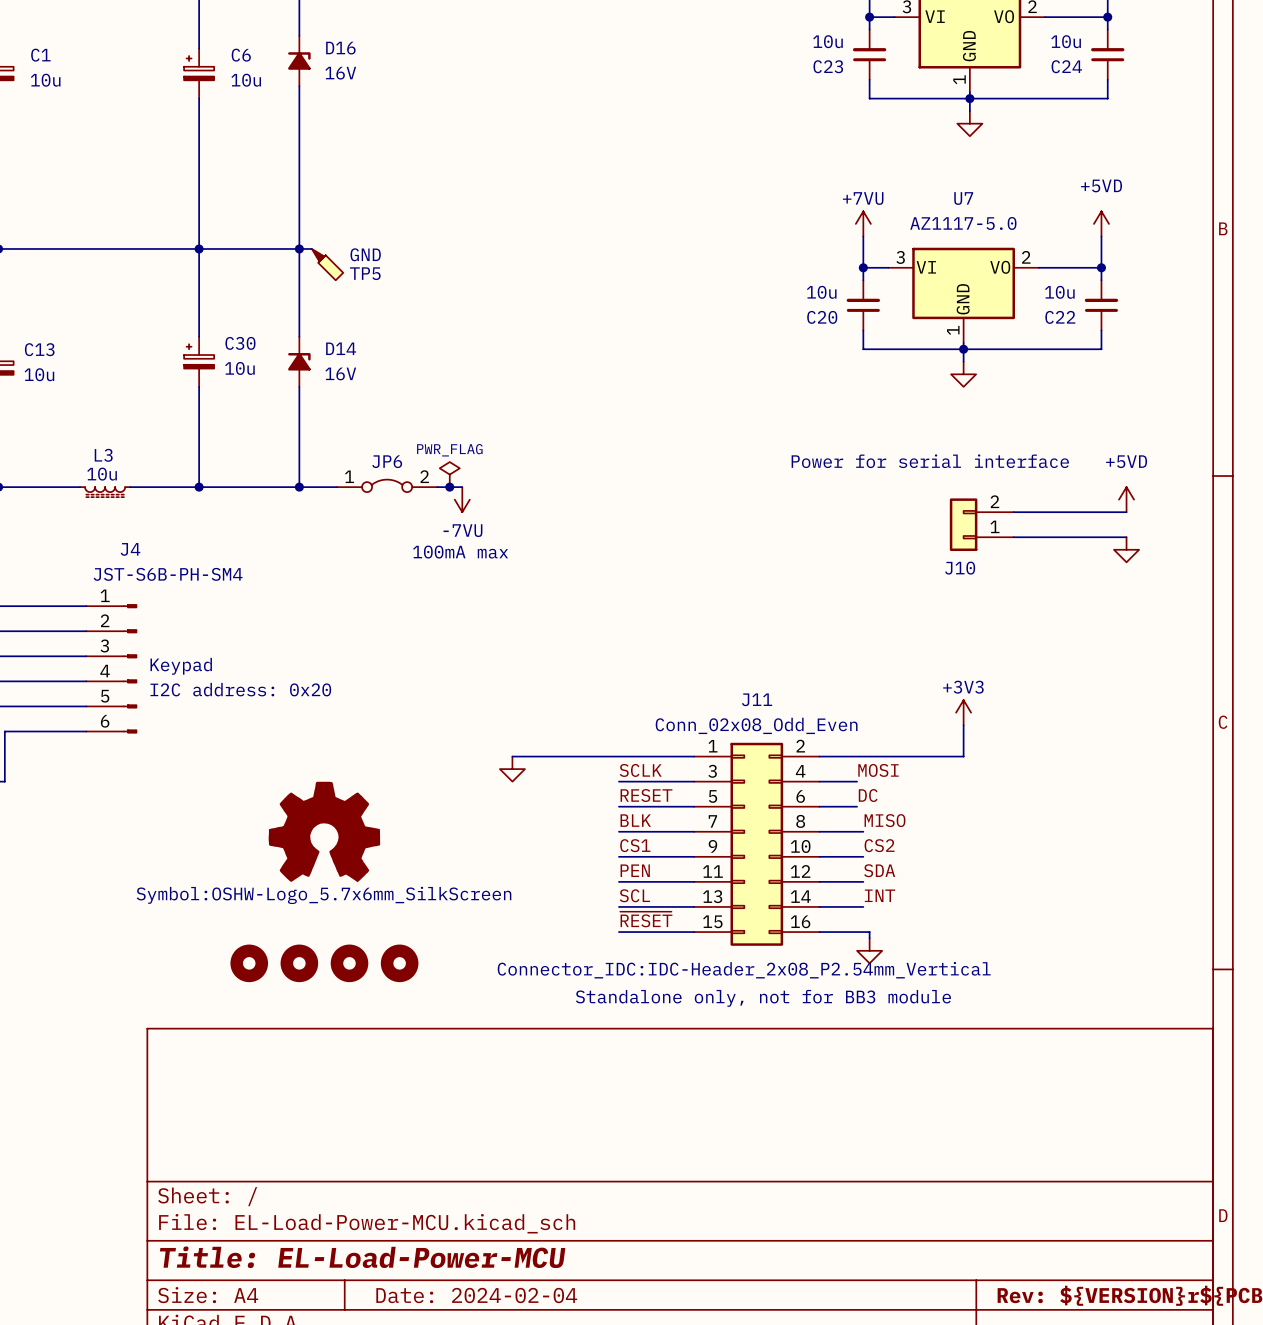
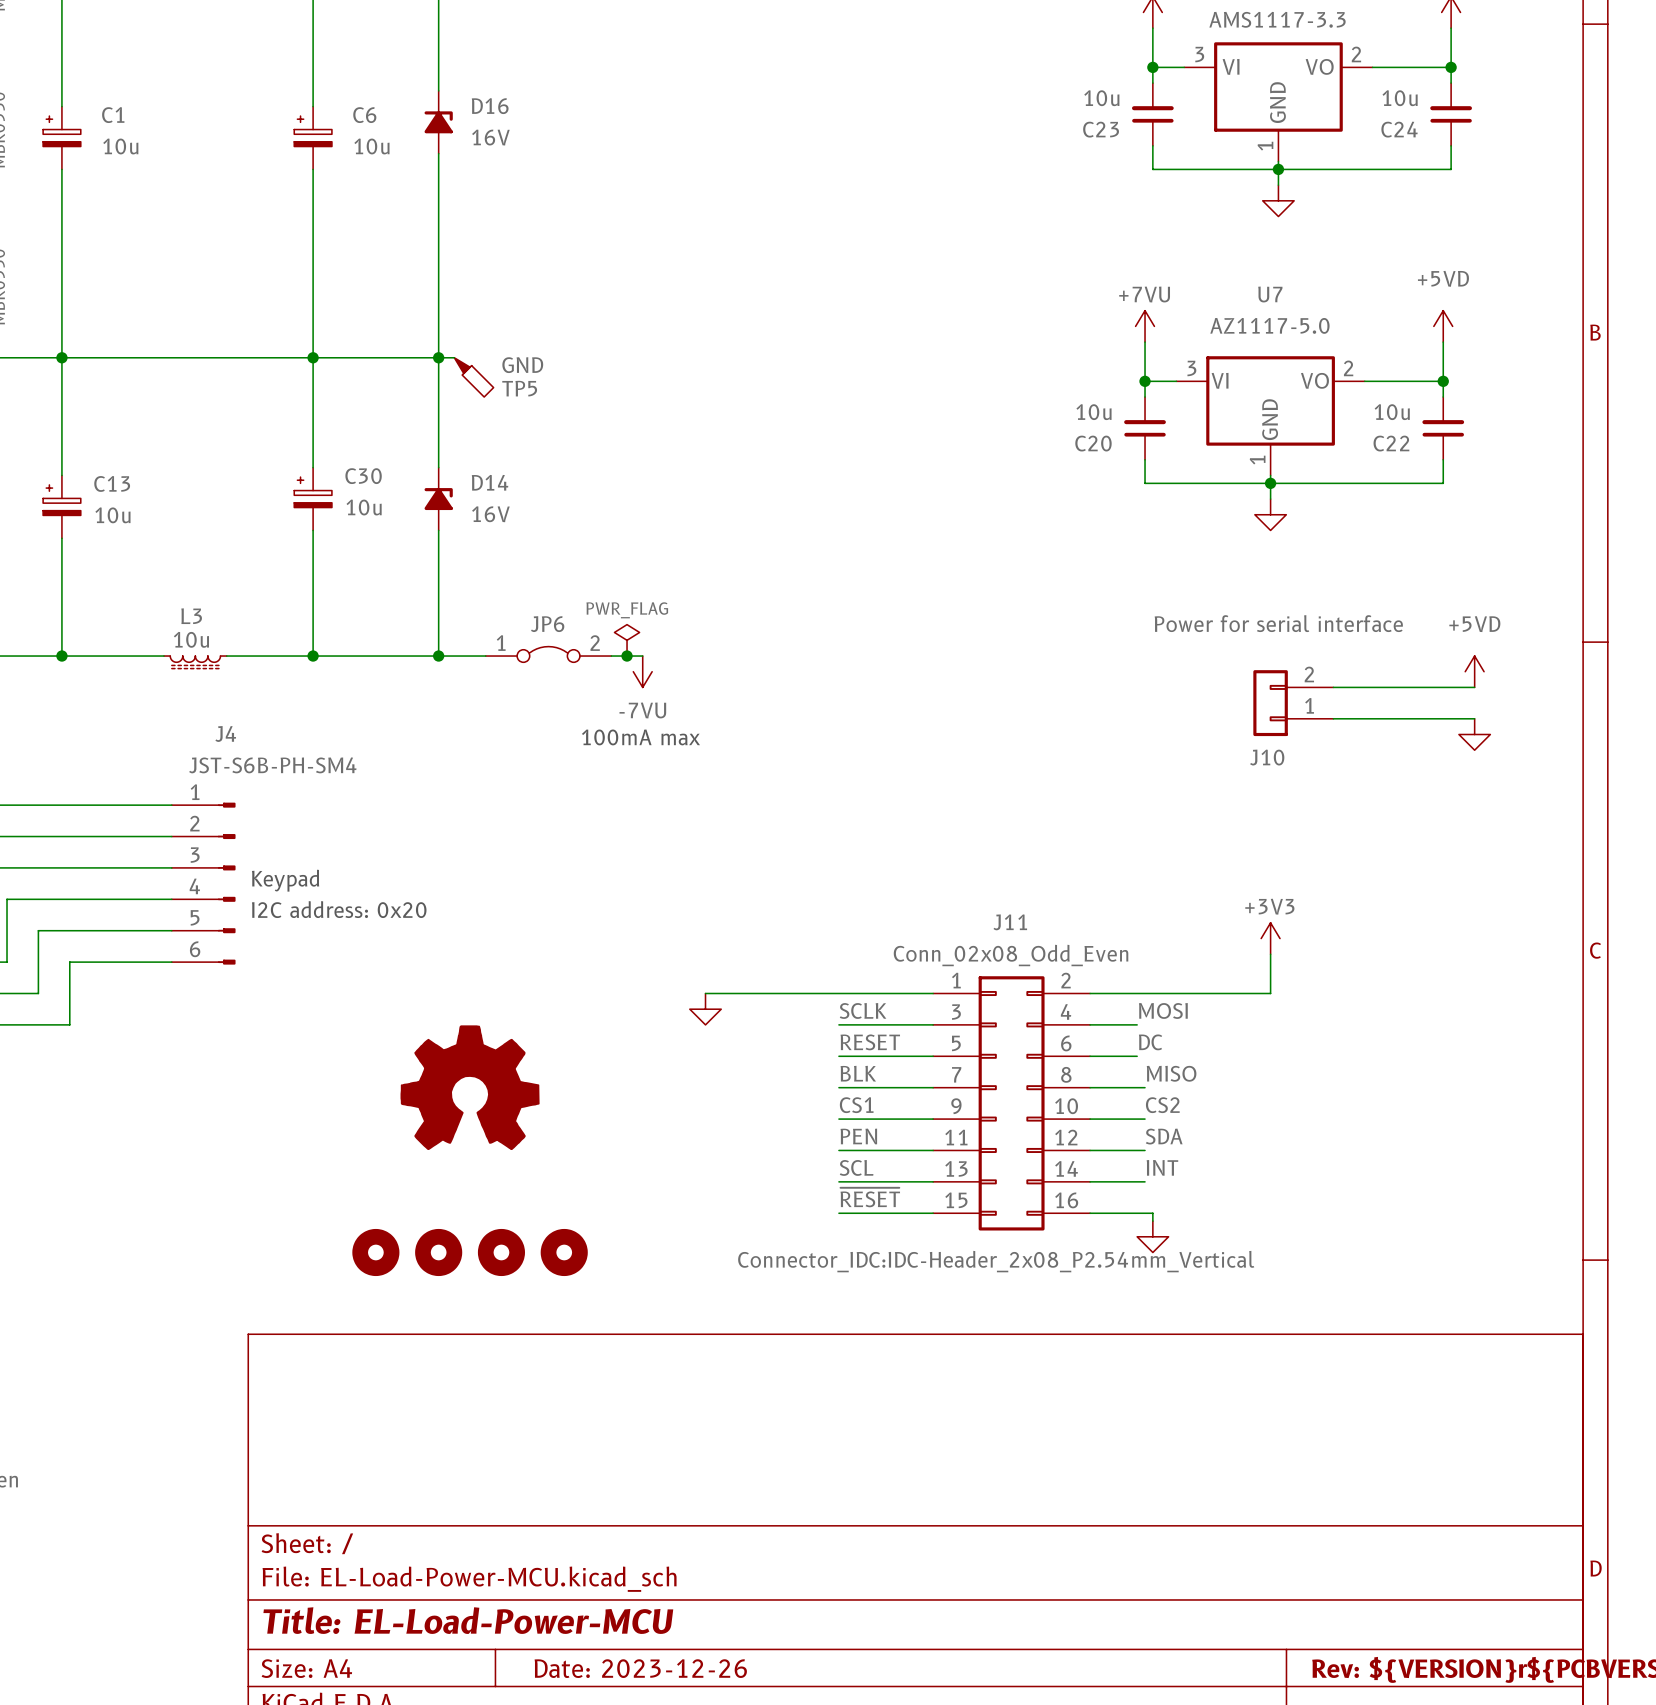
part text: Symbol:OSHW-Logo_5.7x6mm_SilkScreen (324, 895) -> none
text: Standalone only, not for BB3 module (763, 998) -> none
title block: Date: 2024-02-04 (476, 1295) -> Date: 2023-12-26 (640, 1668)

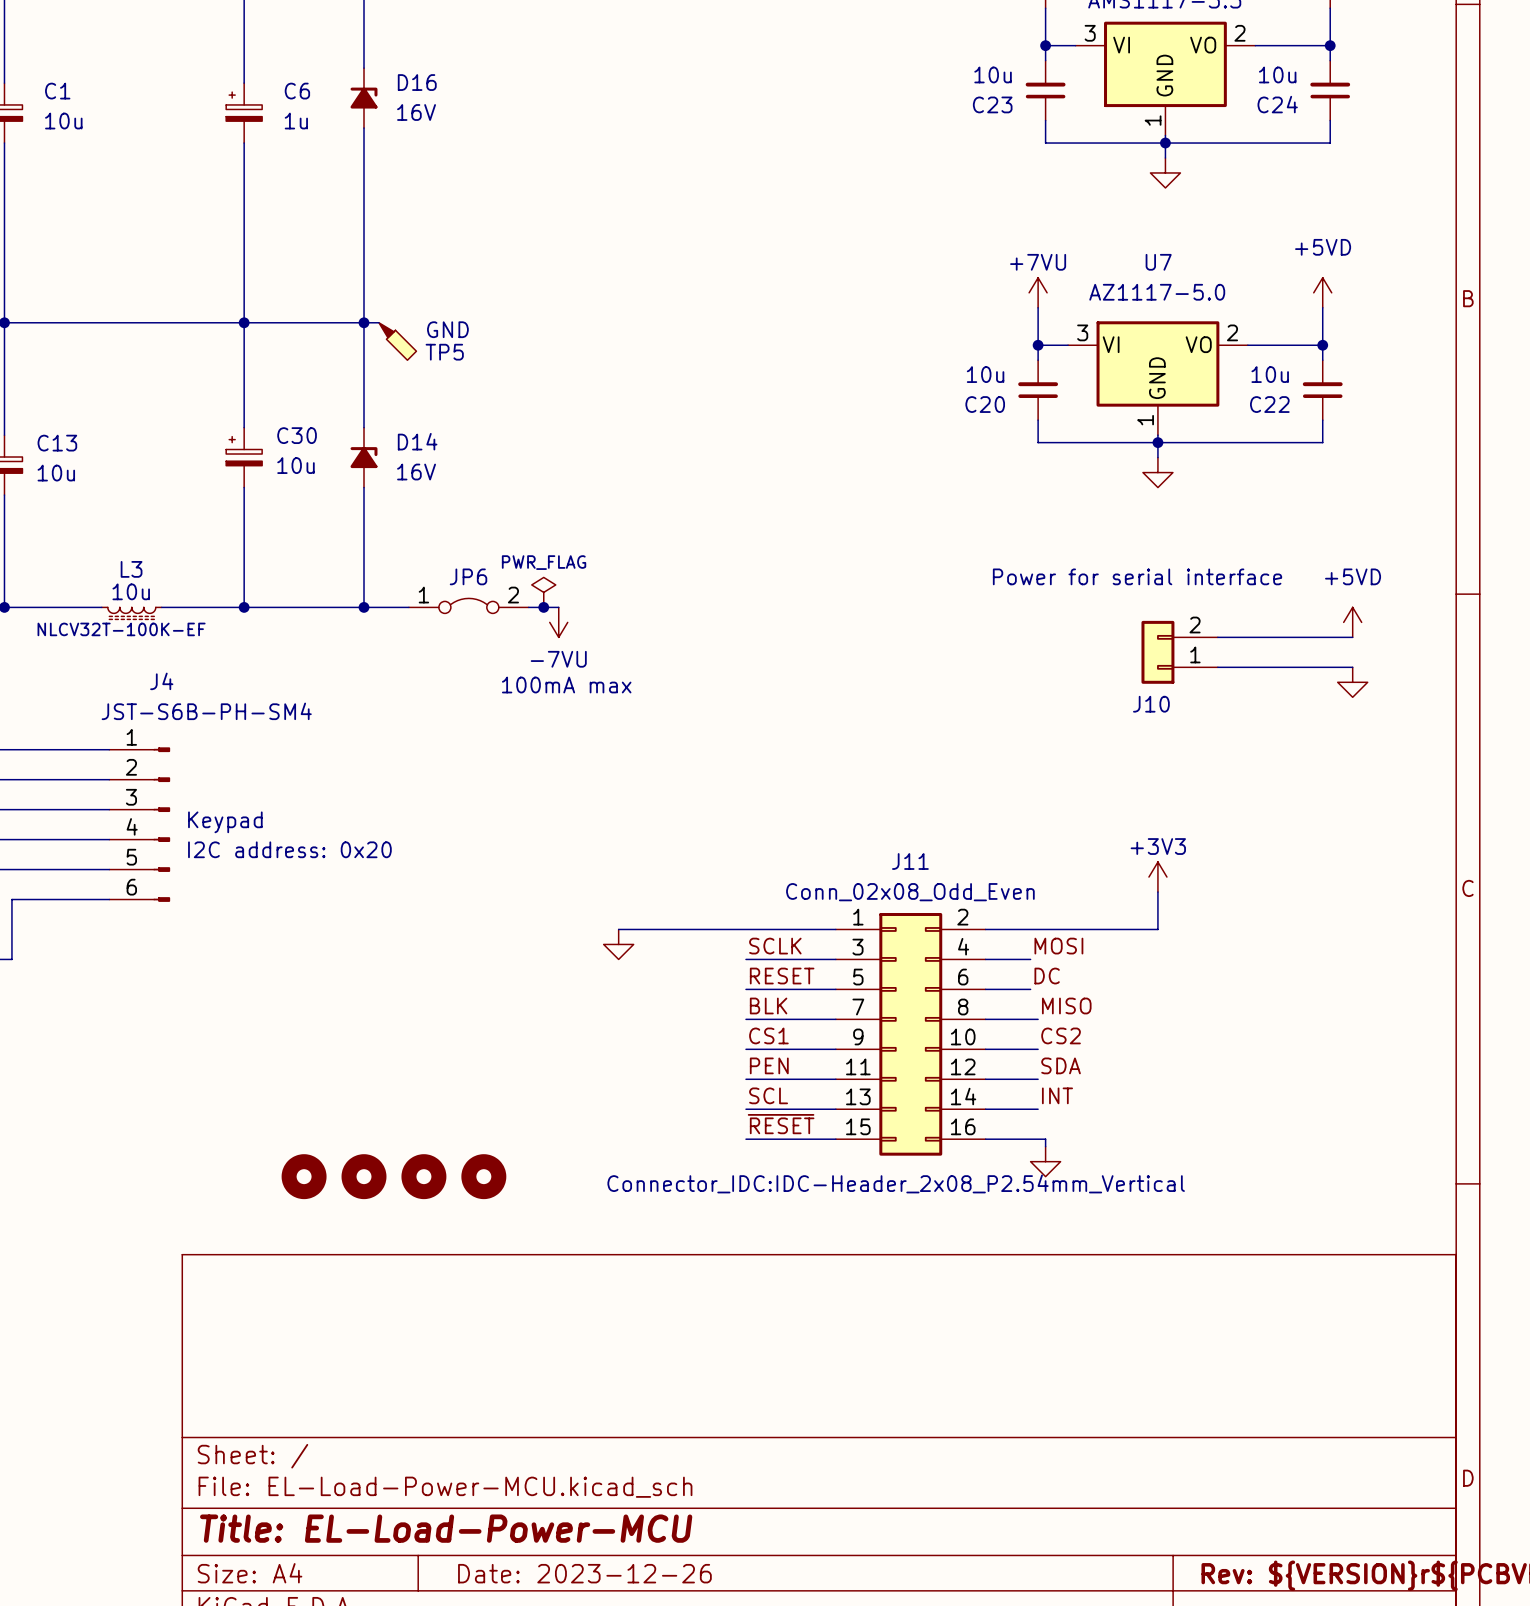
C6 value: 10u (371, 146) -> 1u (296, 121)
L3 text: none -> NLCV32T-100K-EF (121, 629)
part: (470, 1087) -> none

